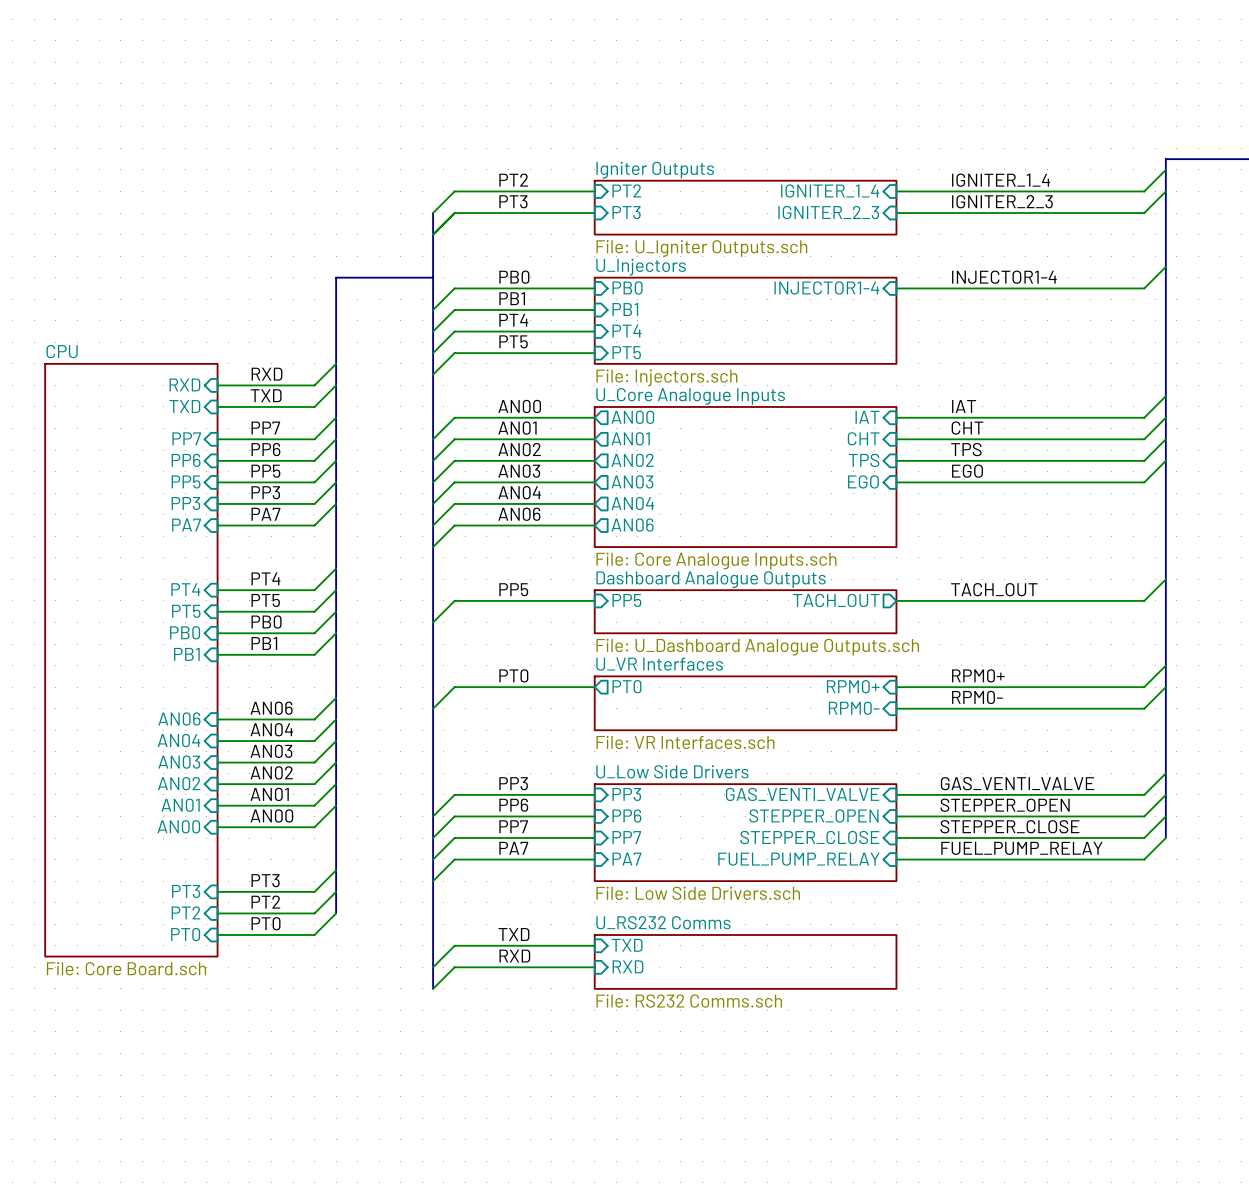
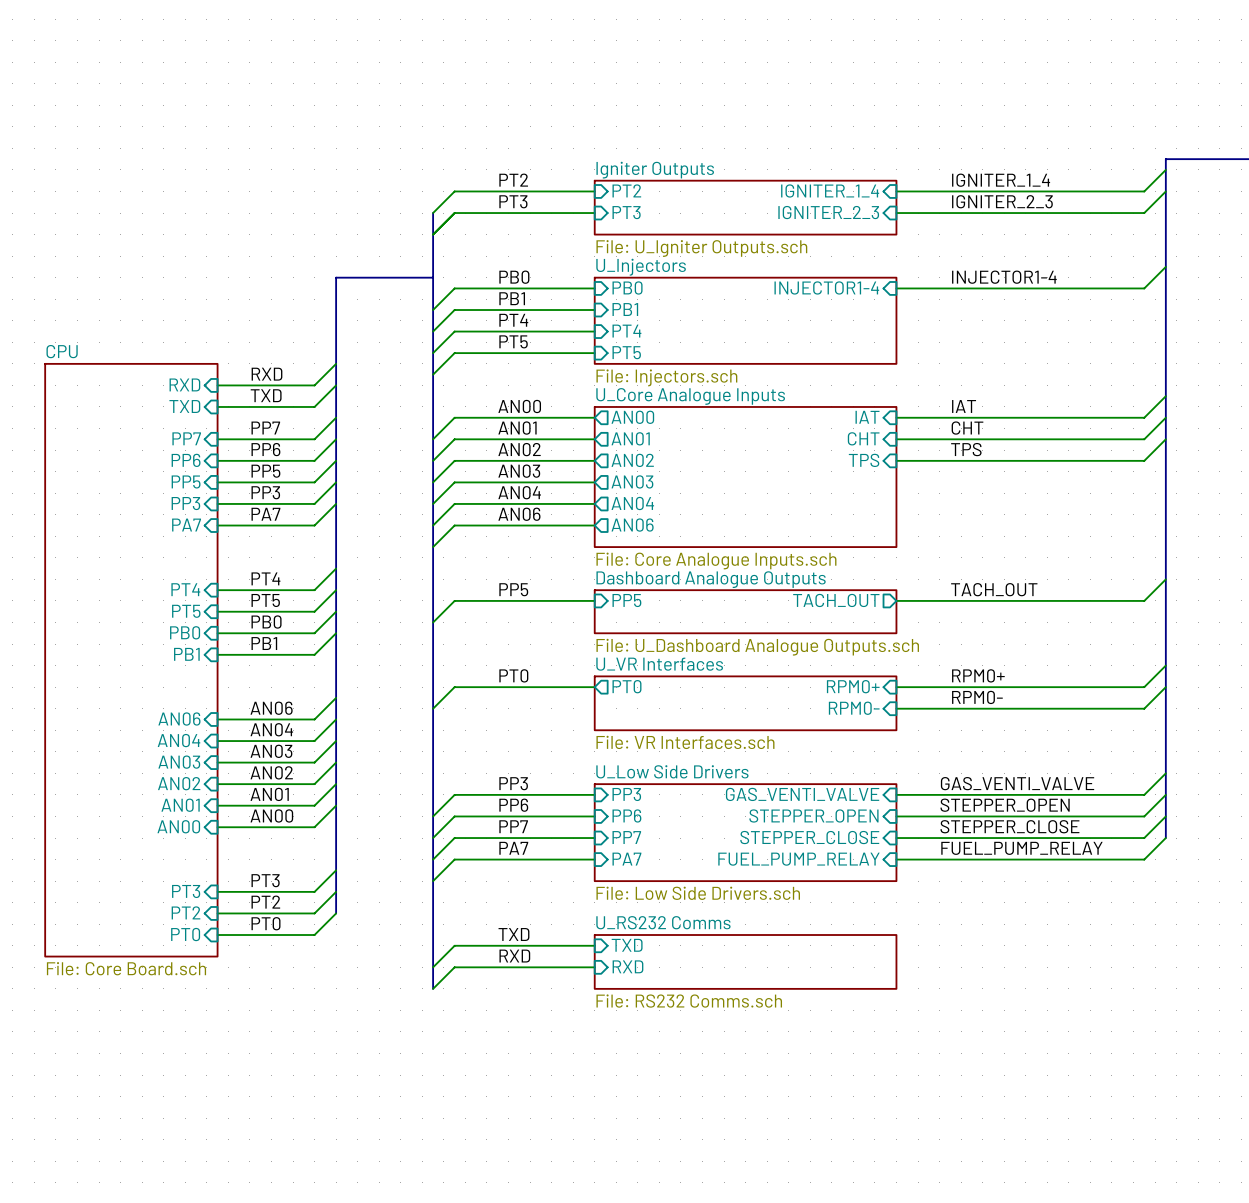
wire: (1165, 460) (1144, 482) (896, 482) -> none
label: EGO (967, 471) -> none
sheet pin: EGO (863, 481) -> none

